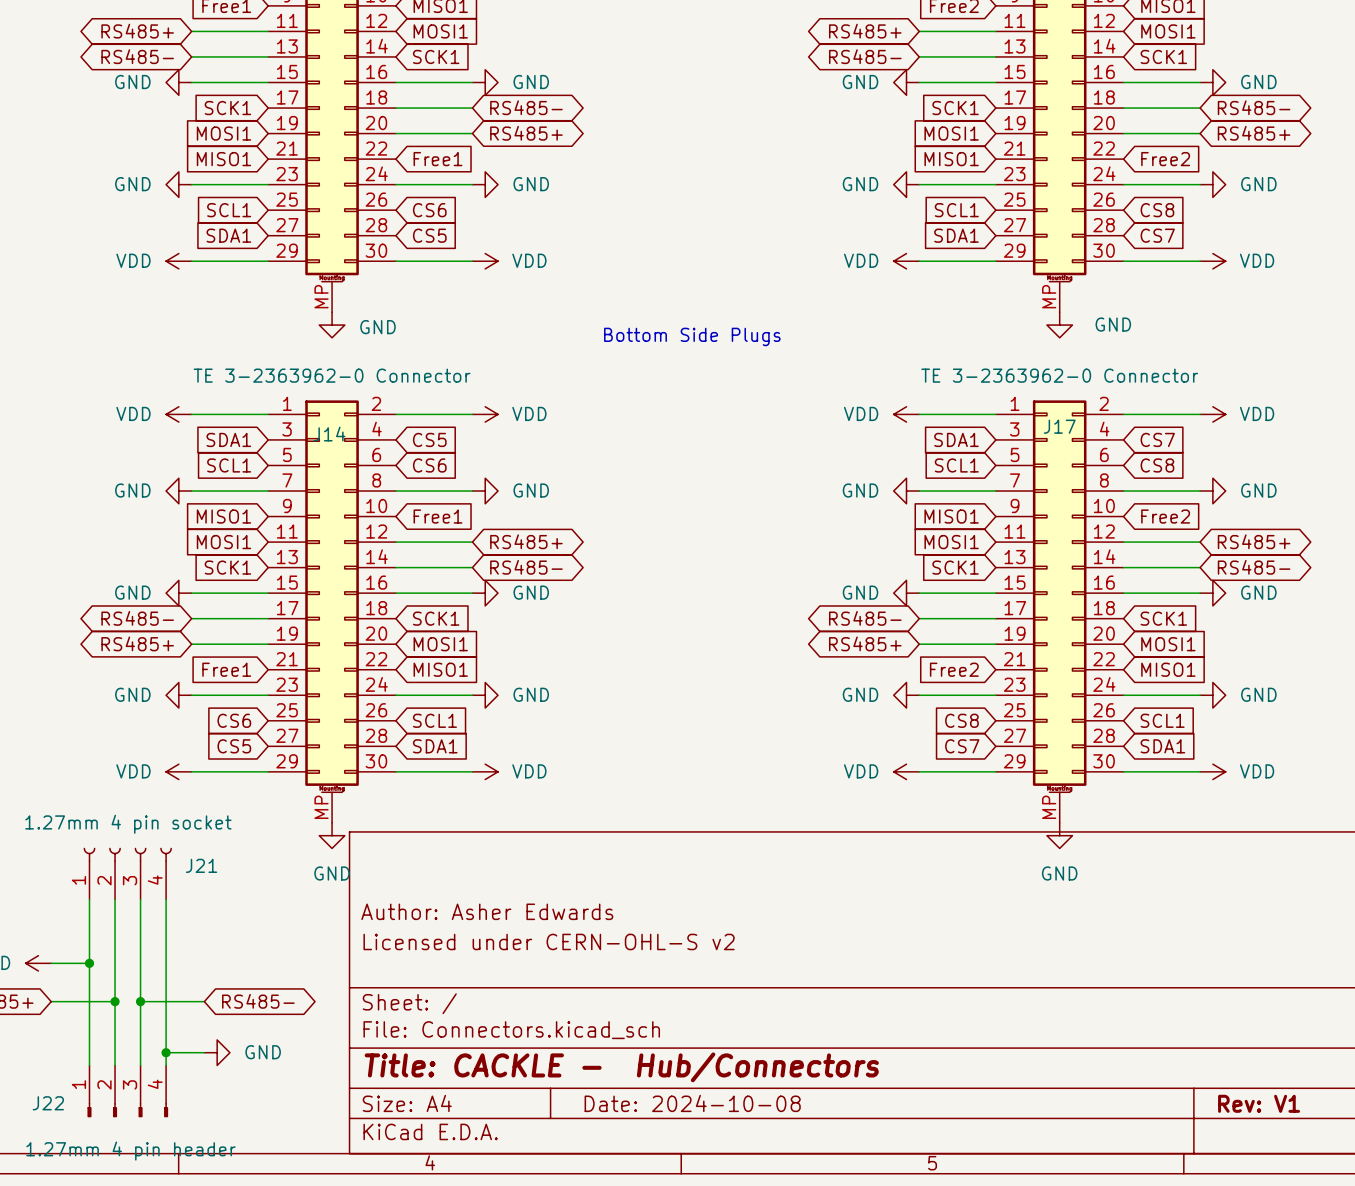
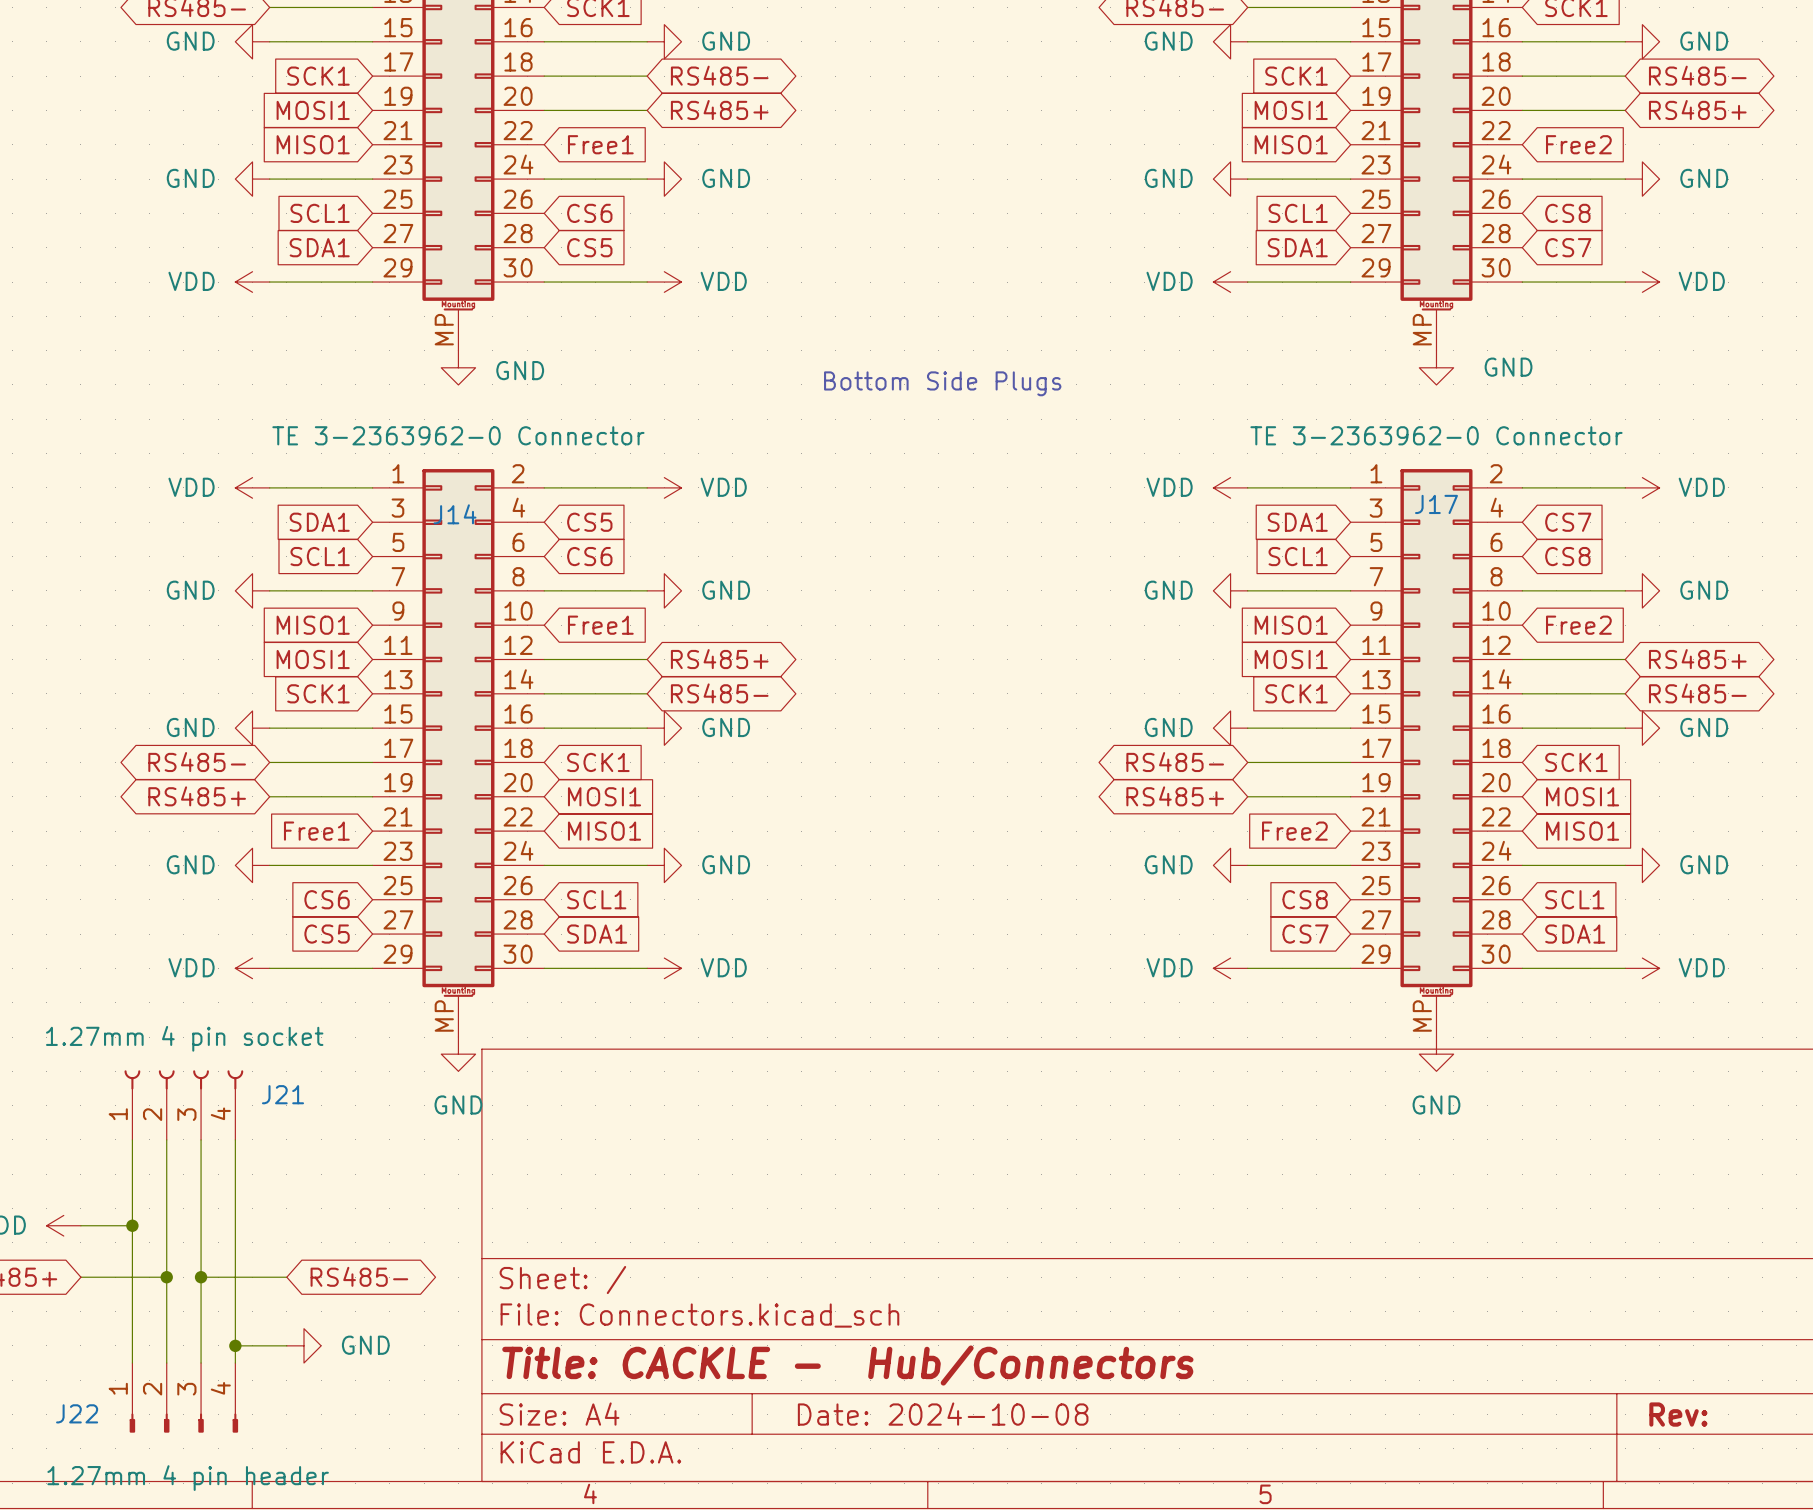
title block: Author: Asher Edwards (487, 911) -> none
title block: Licensed under CERN-OHL-S v2 (549, 941) -> none
title block: Rev: V1 (1259, 1103) -> Rev: (1678, 1414)

